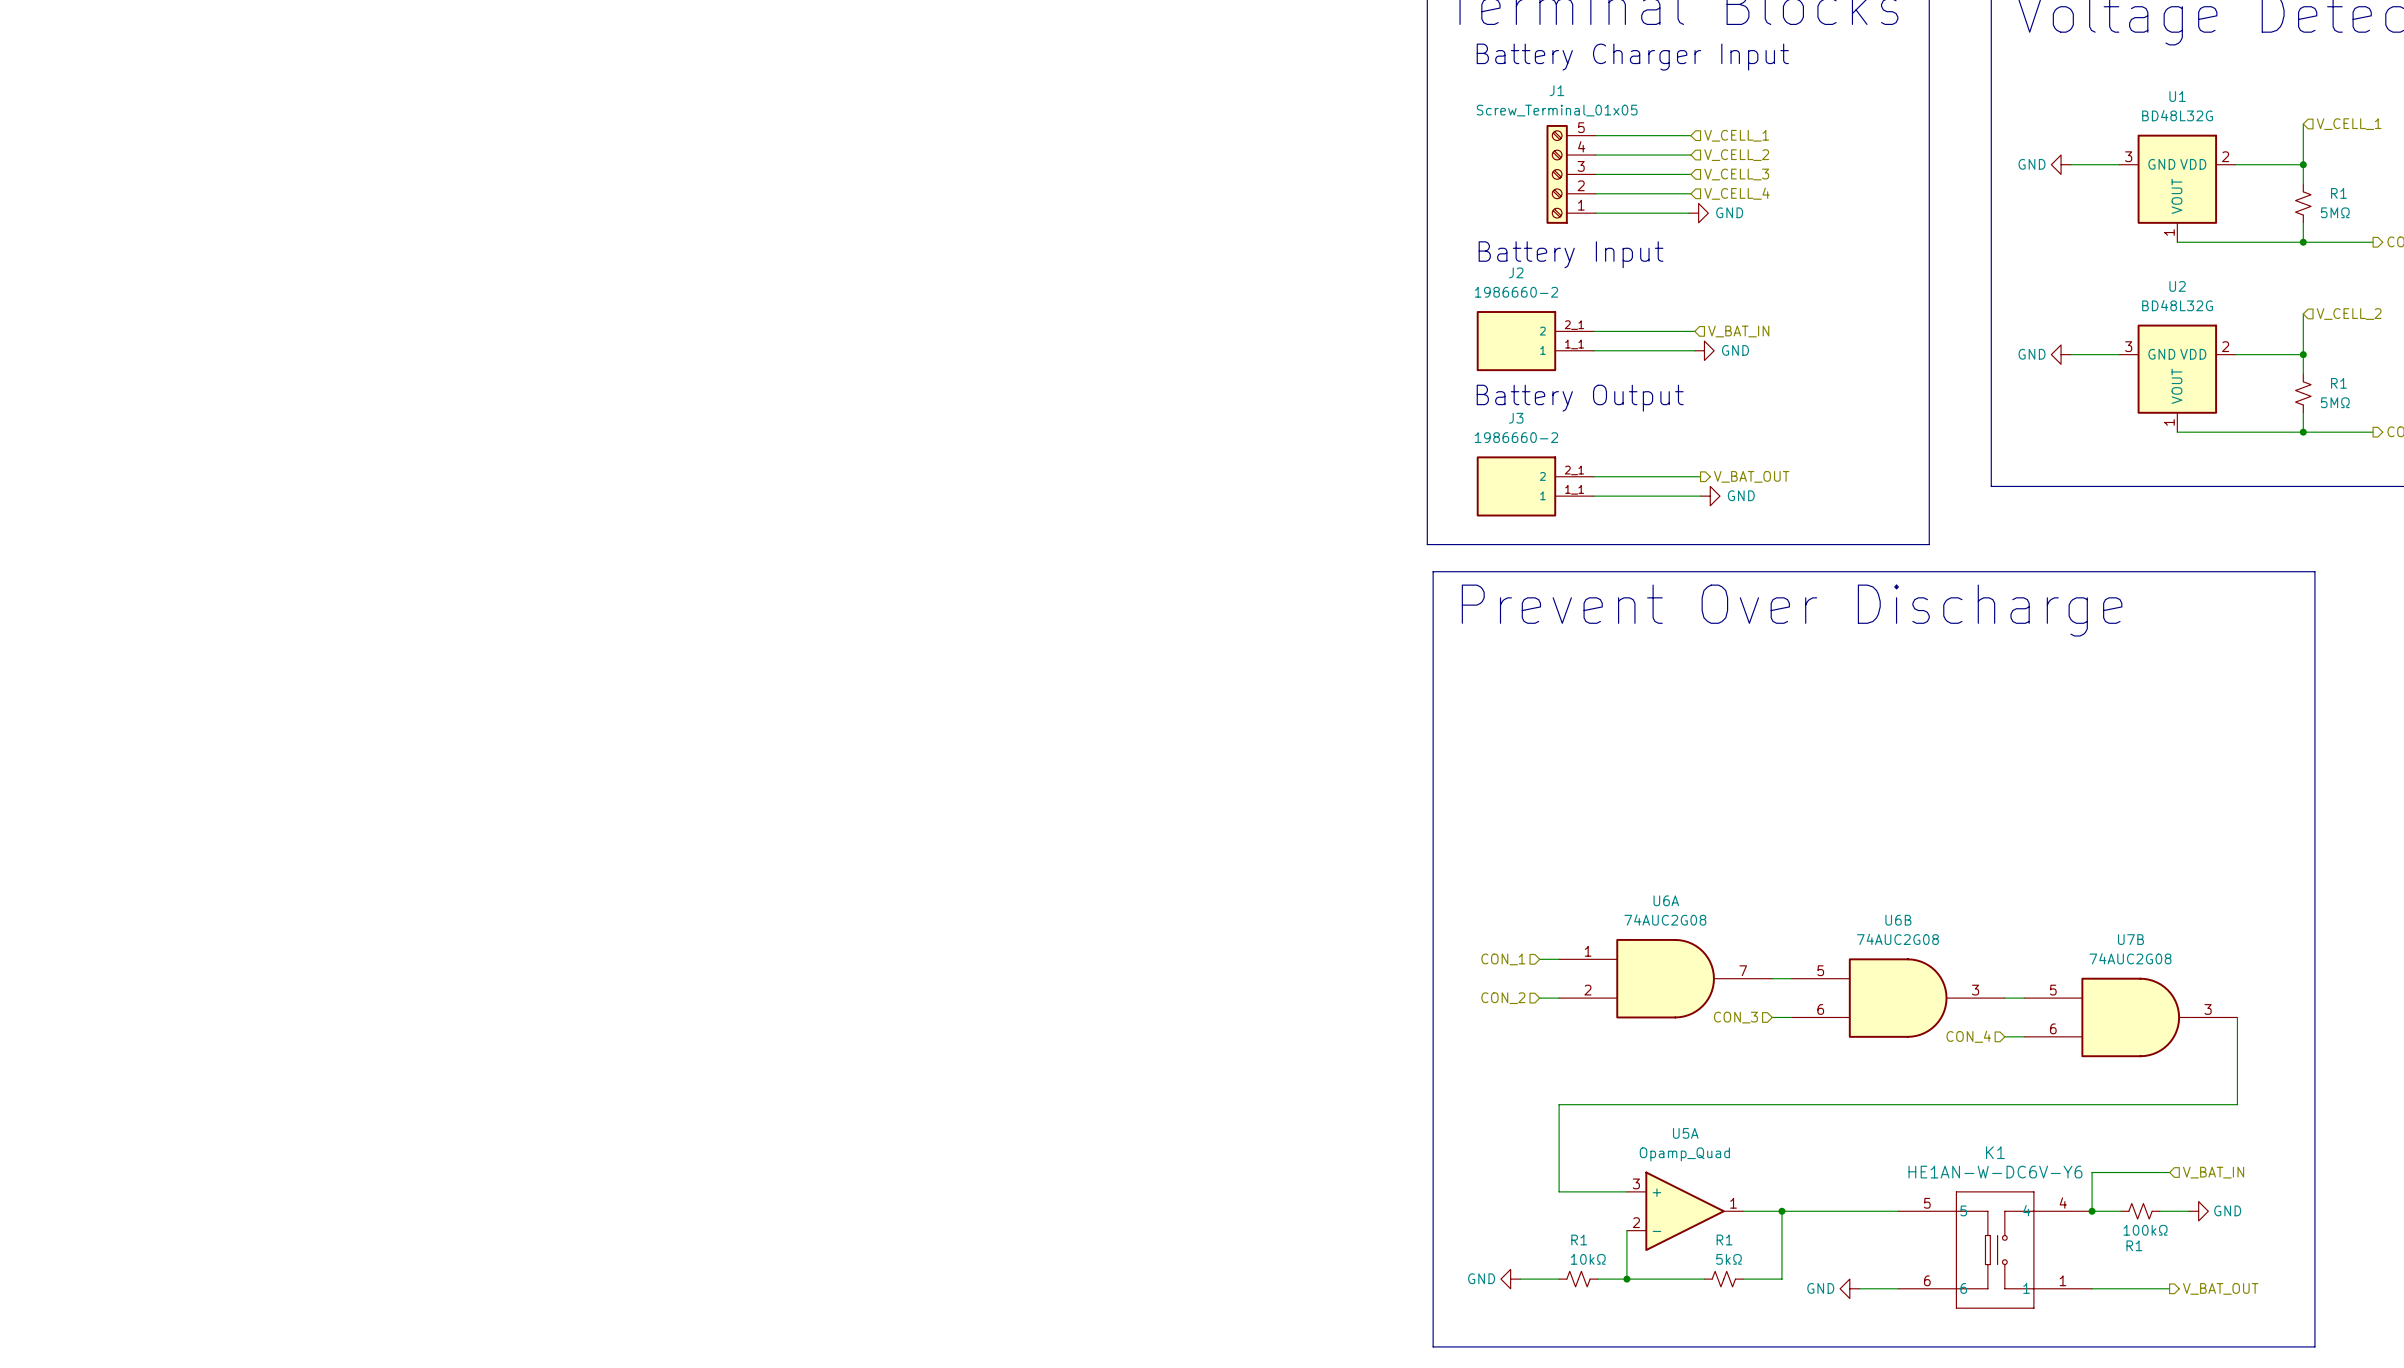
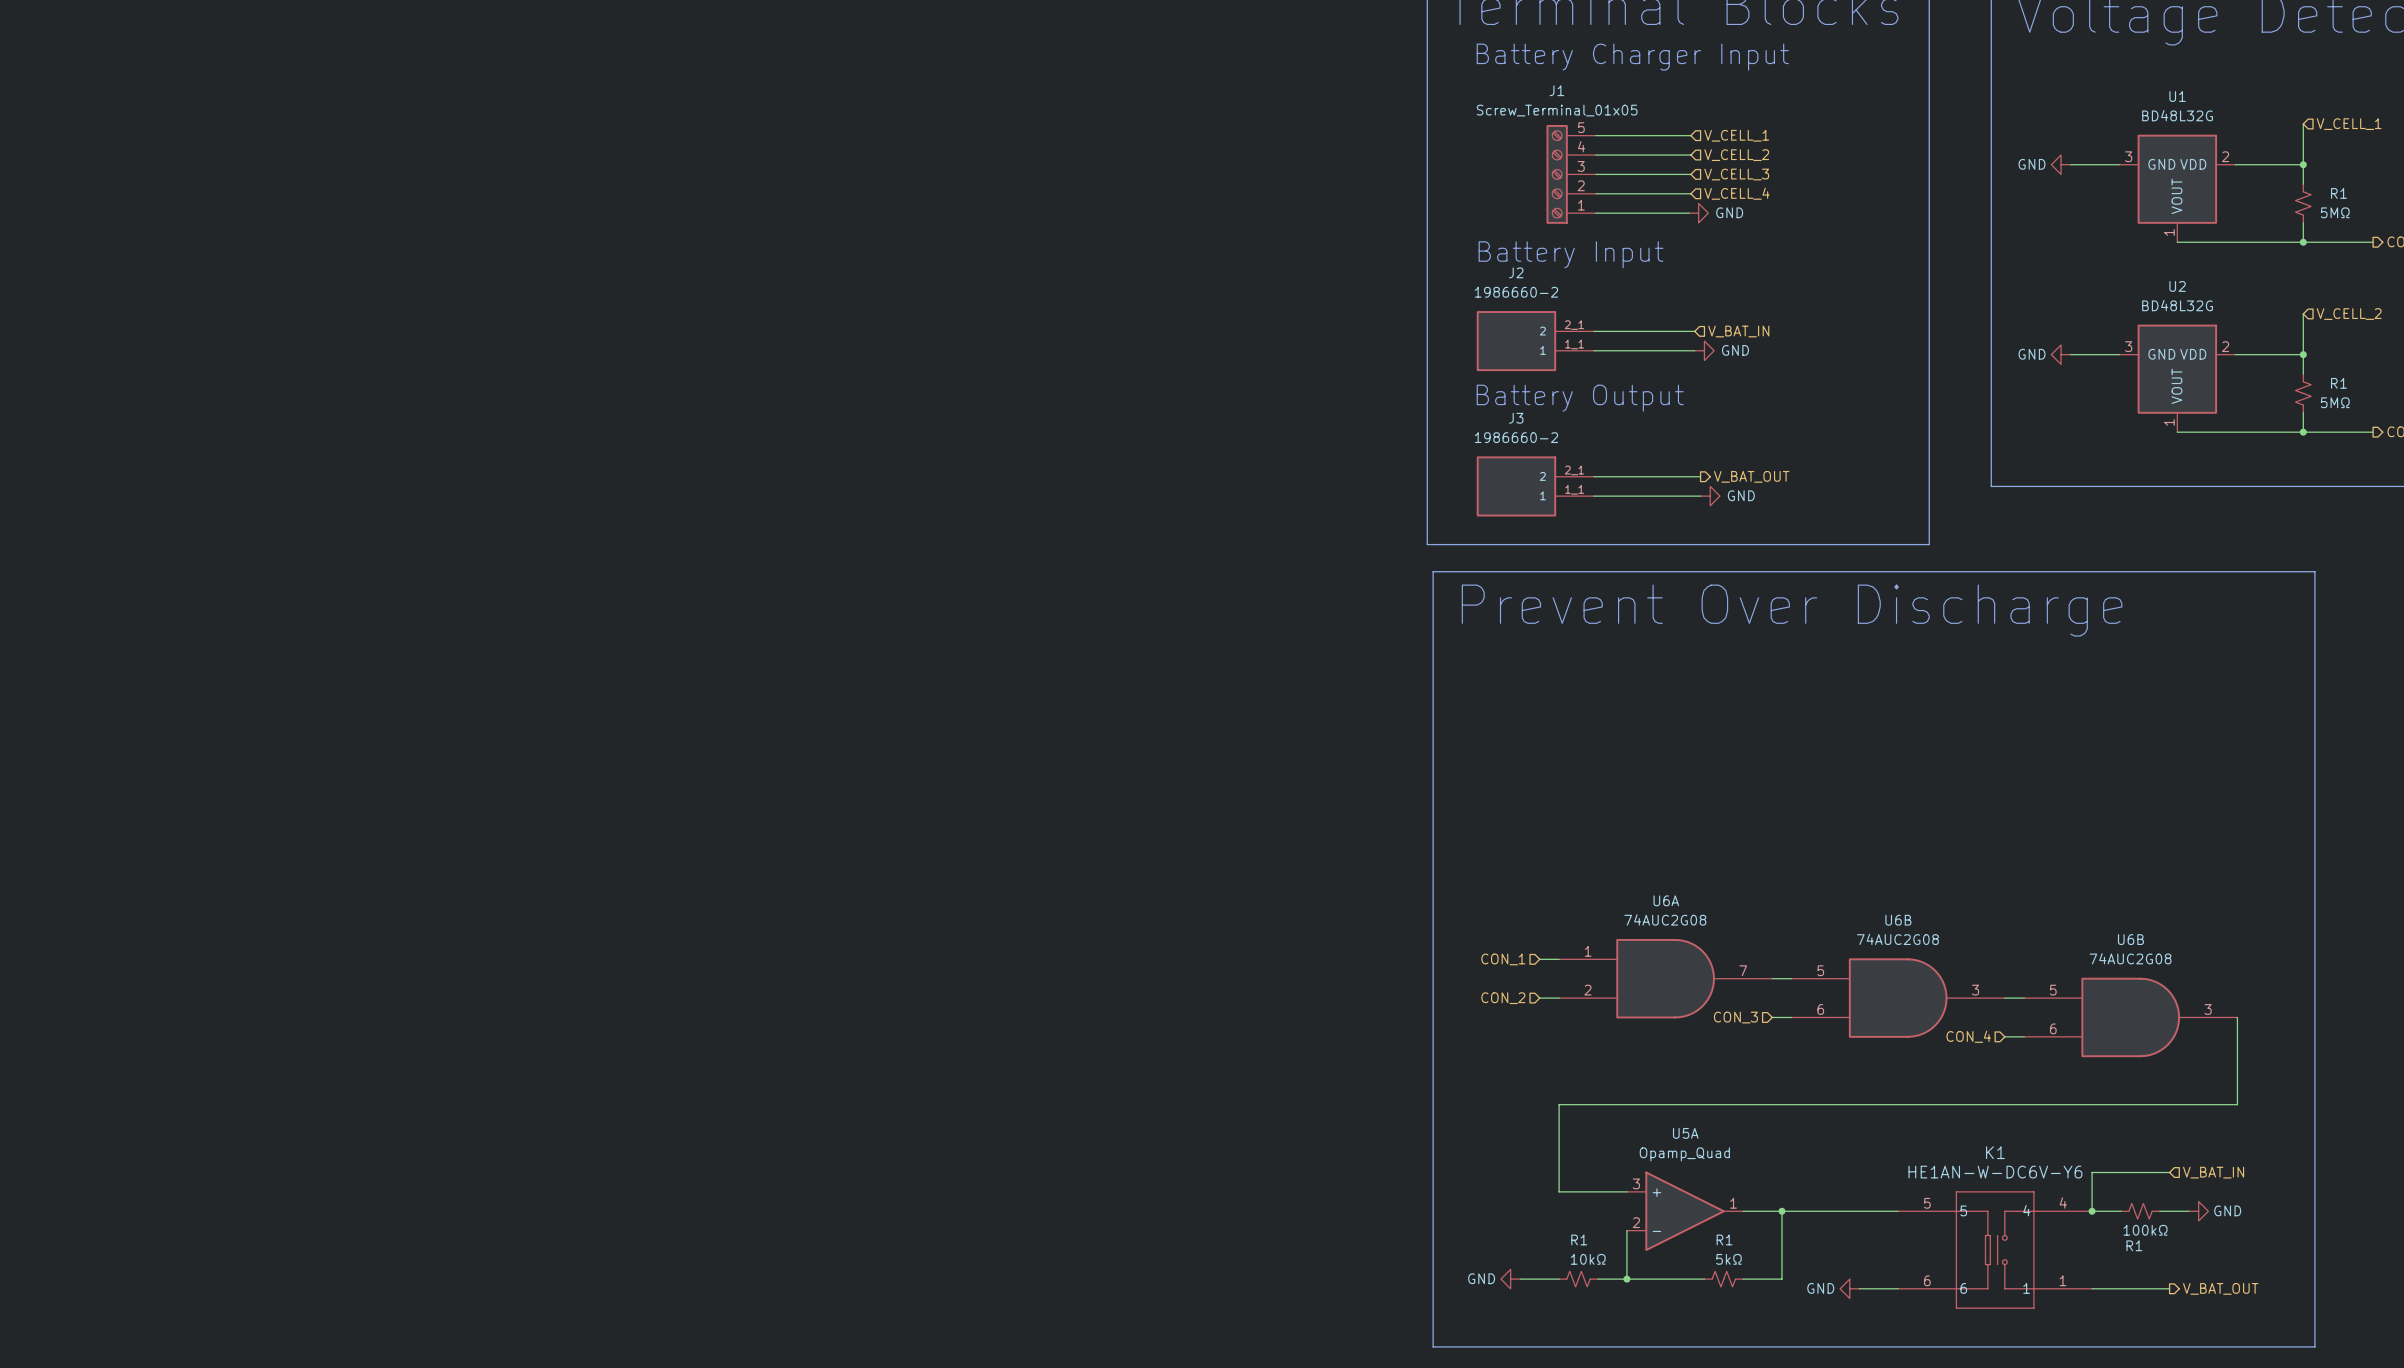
U7B name: U7B (2130, 939) -> U6B (2130, 939)

